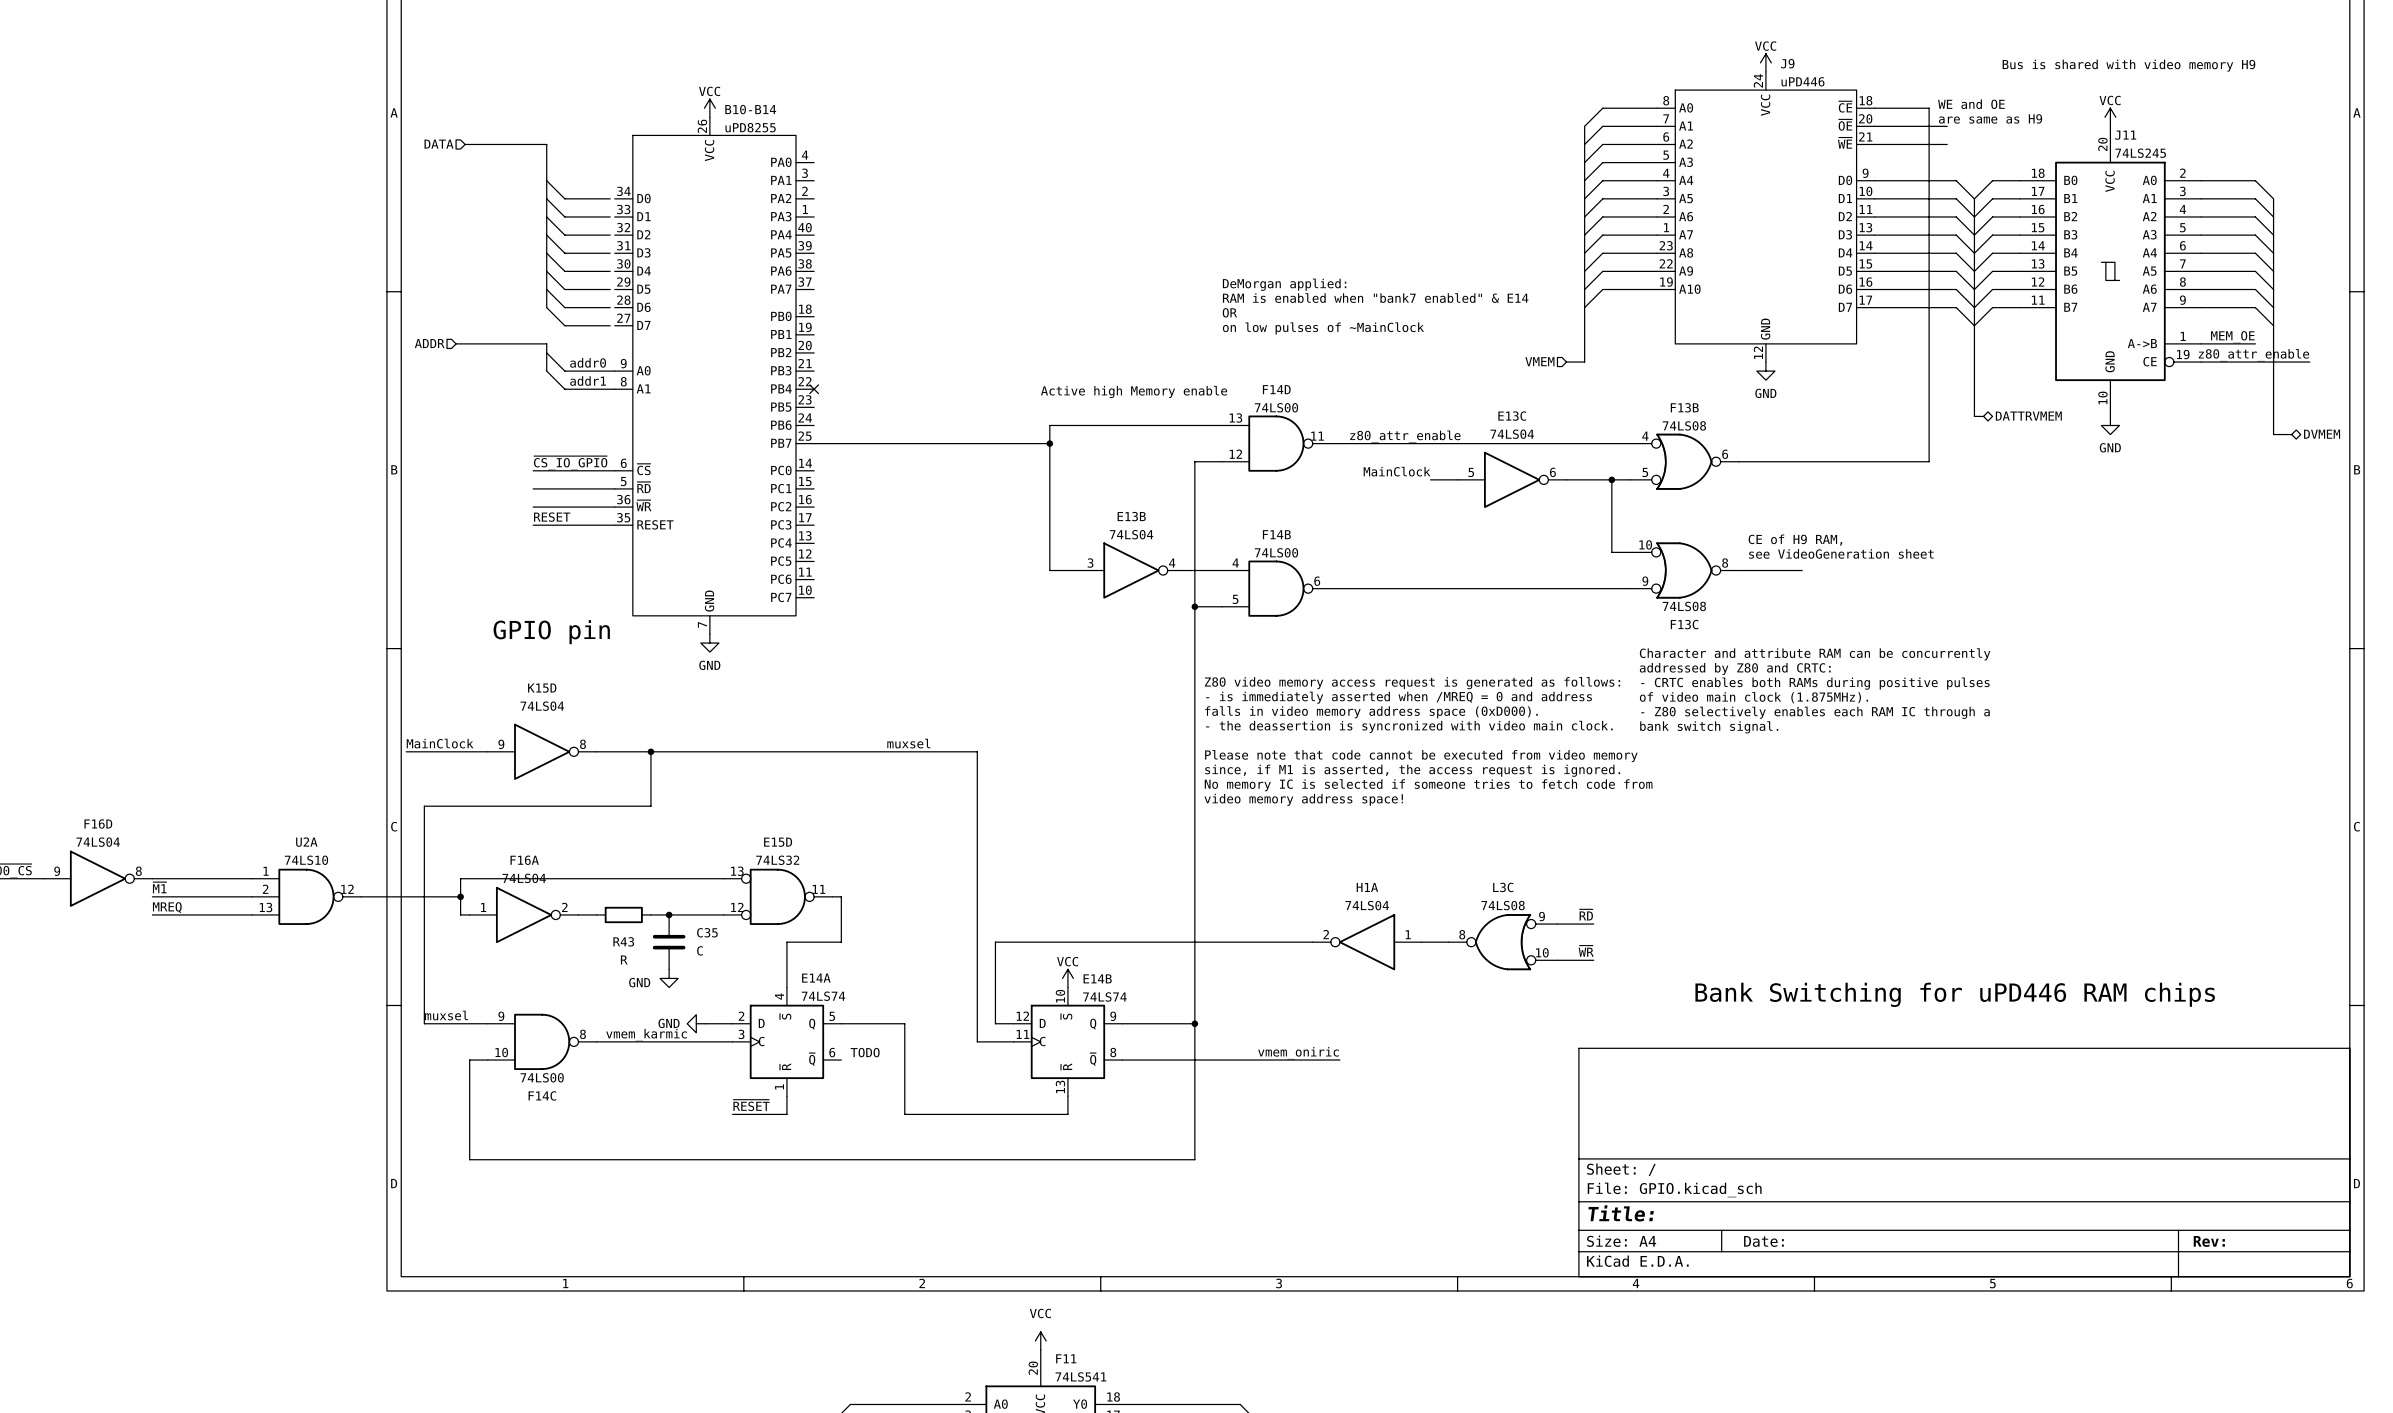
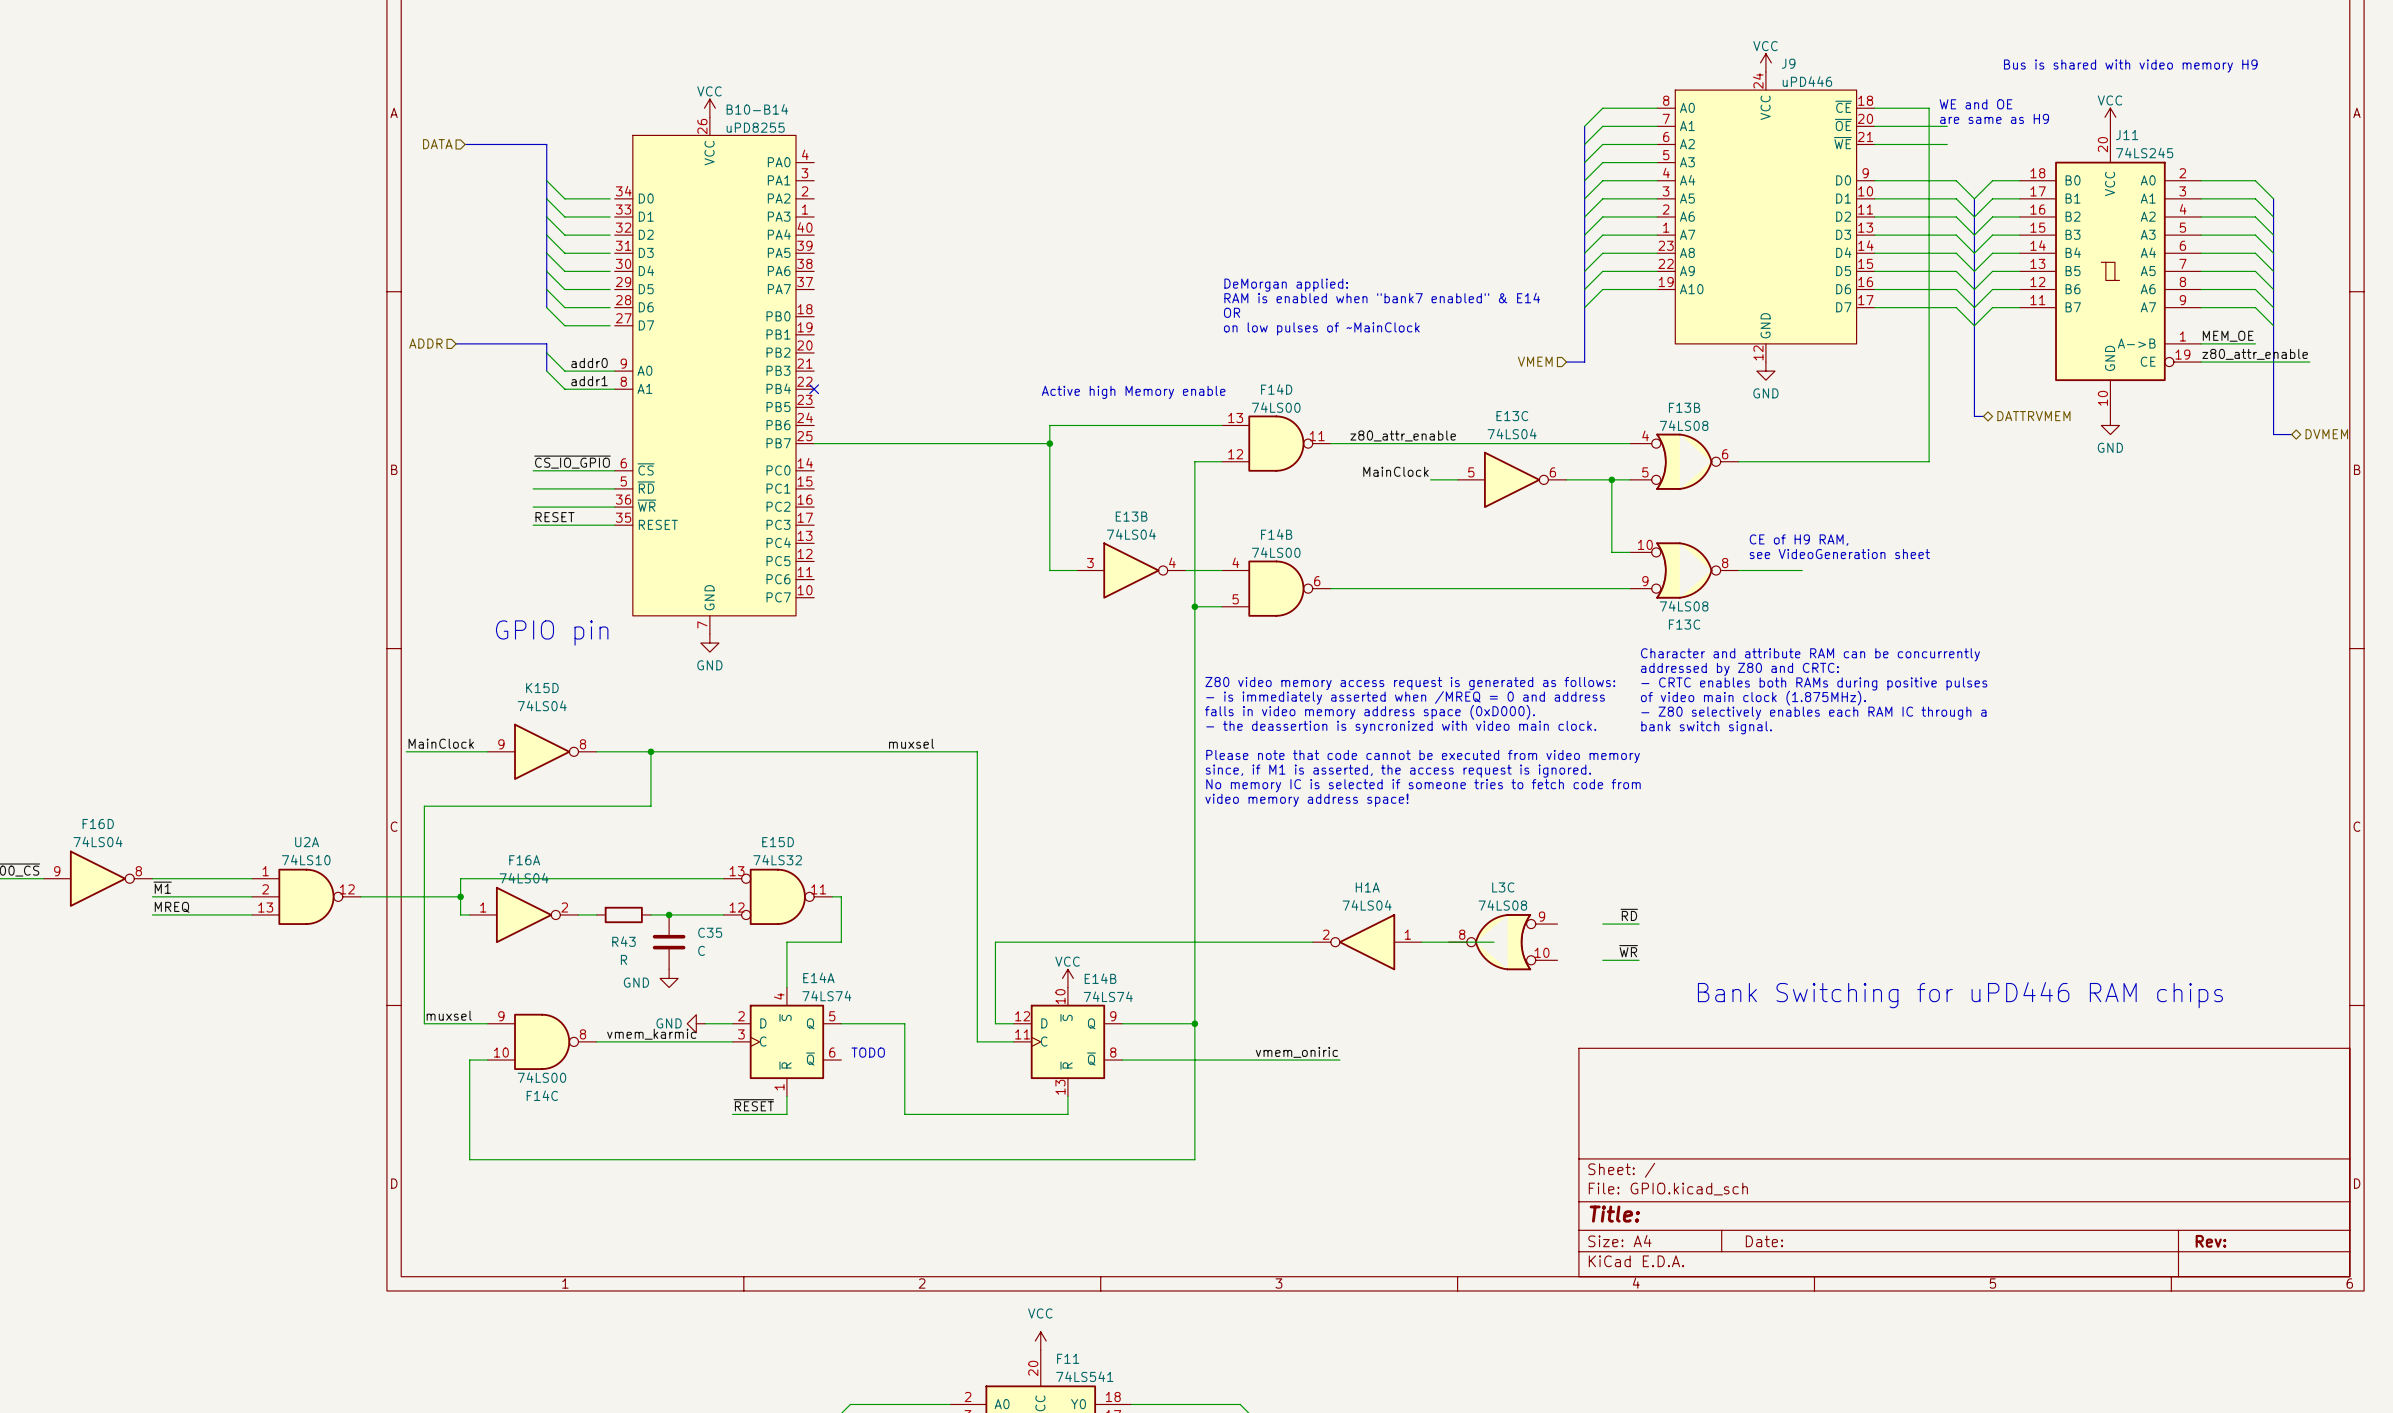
label position: ~{RD} (1586, 914) -> ~{RD} (1629, 914)
wire: (1557, 924) (1593, 924) -> (1602, 924) (1639, 924)
wire: none -> (1448, 942) (1493, 942)
label position: ~{WR} (1586, 951) -> ~{WR} (1628, 951)
wire: (1557, 960) (1593, 960) -> (1602, 960) (1639, 960)

